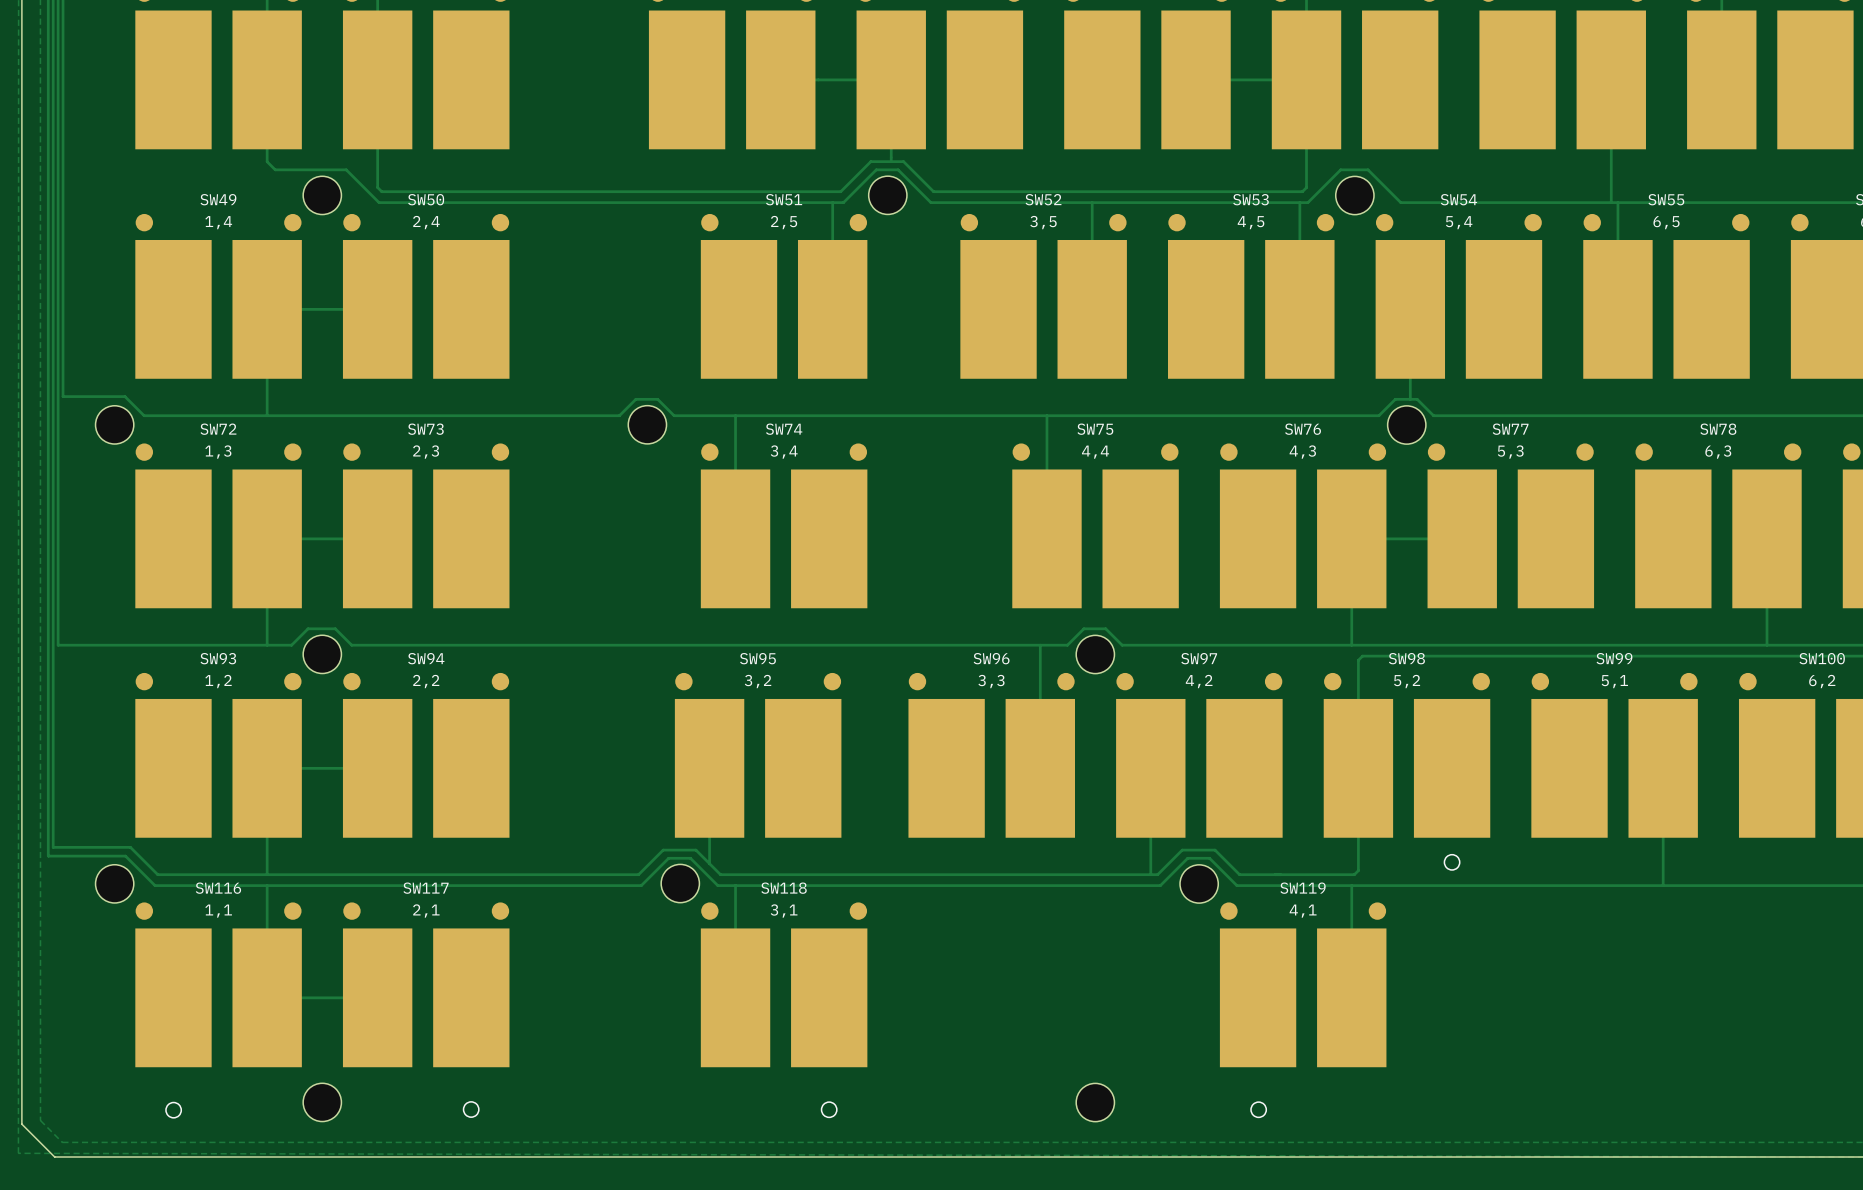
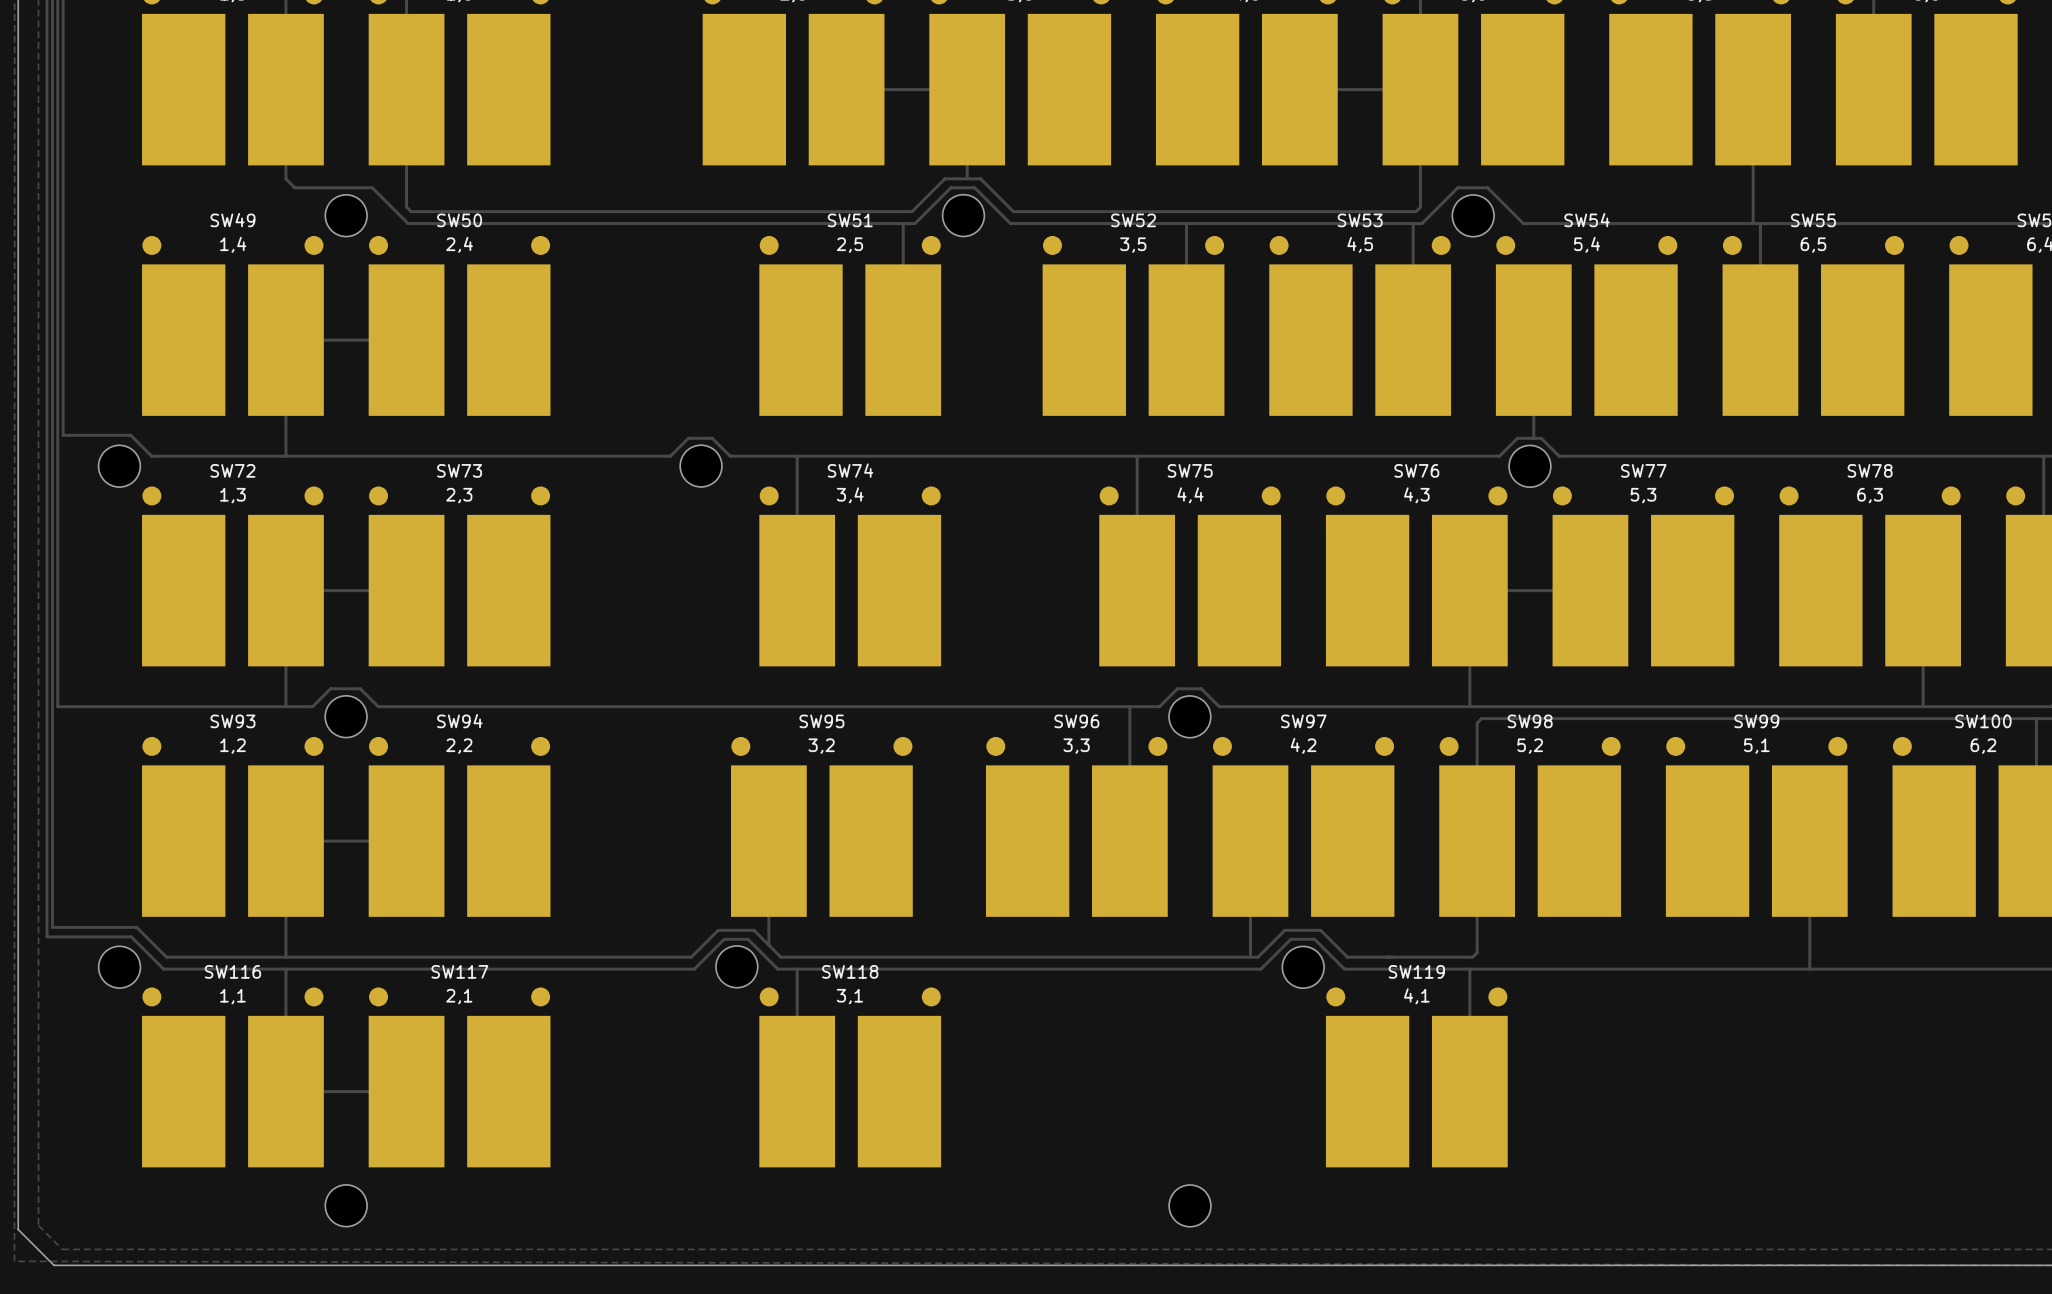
part: (1452, 862) -> none
part: (471, 1109) -> none
part: (829, 1109) -> none
part: (1258, 1109) -> none
part: (173, 1110) -> none

